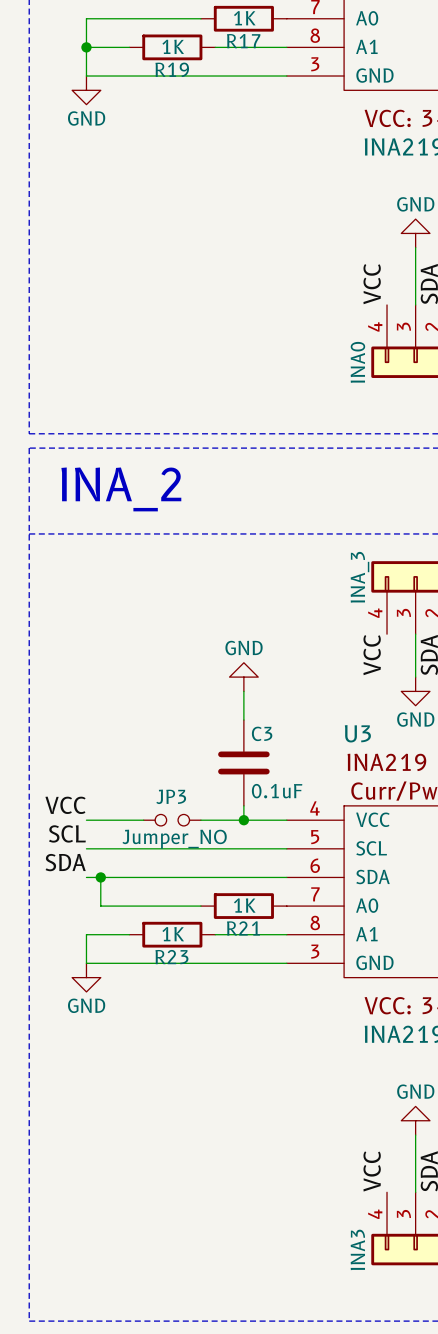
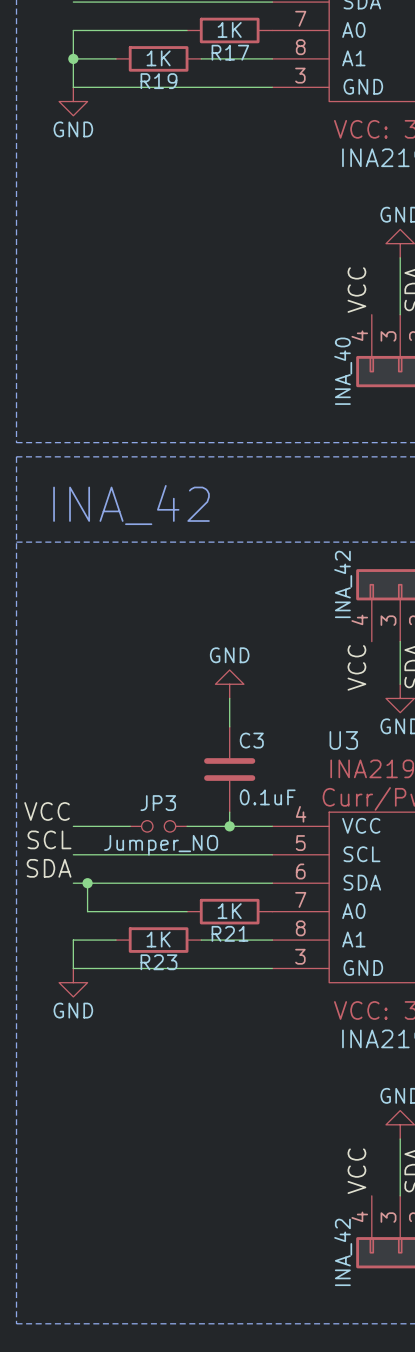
part value: INA0 (357, 362) -> INA_40 (343, 371)
text: INA_2 (121, 489) -> INA_42 (131, 505)
part value: INA_3 (359, 577) -> INA_42 (343, 584)
part value: INA3 (357, 1249) -> INA_42 (343, 1252)

